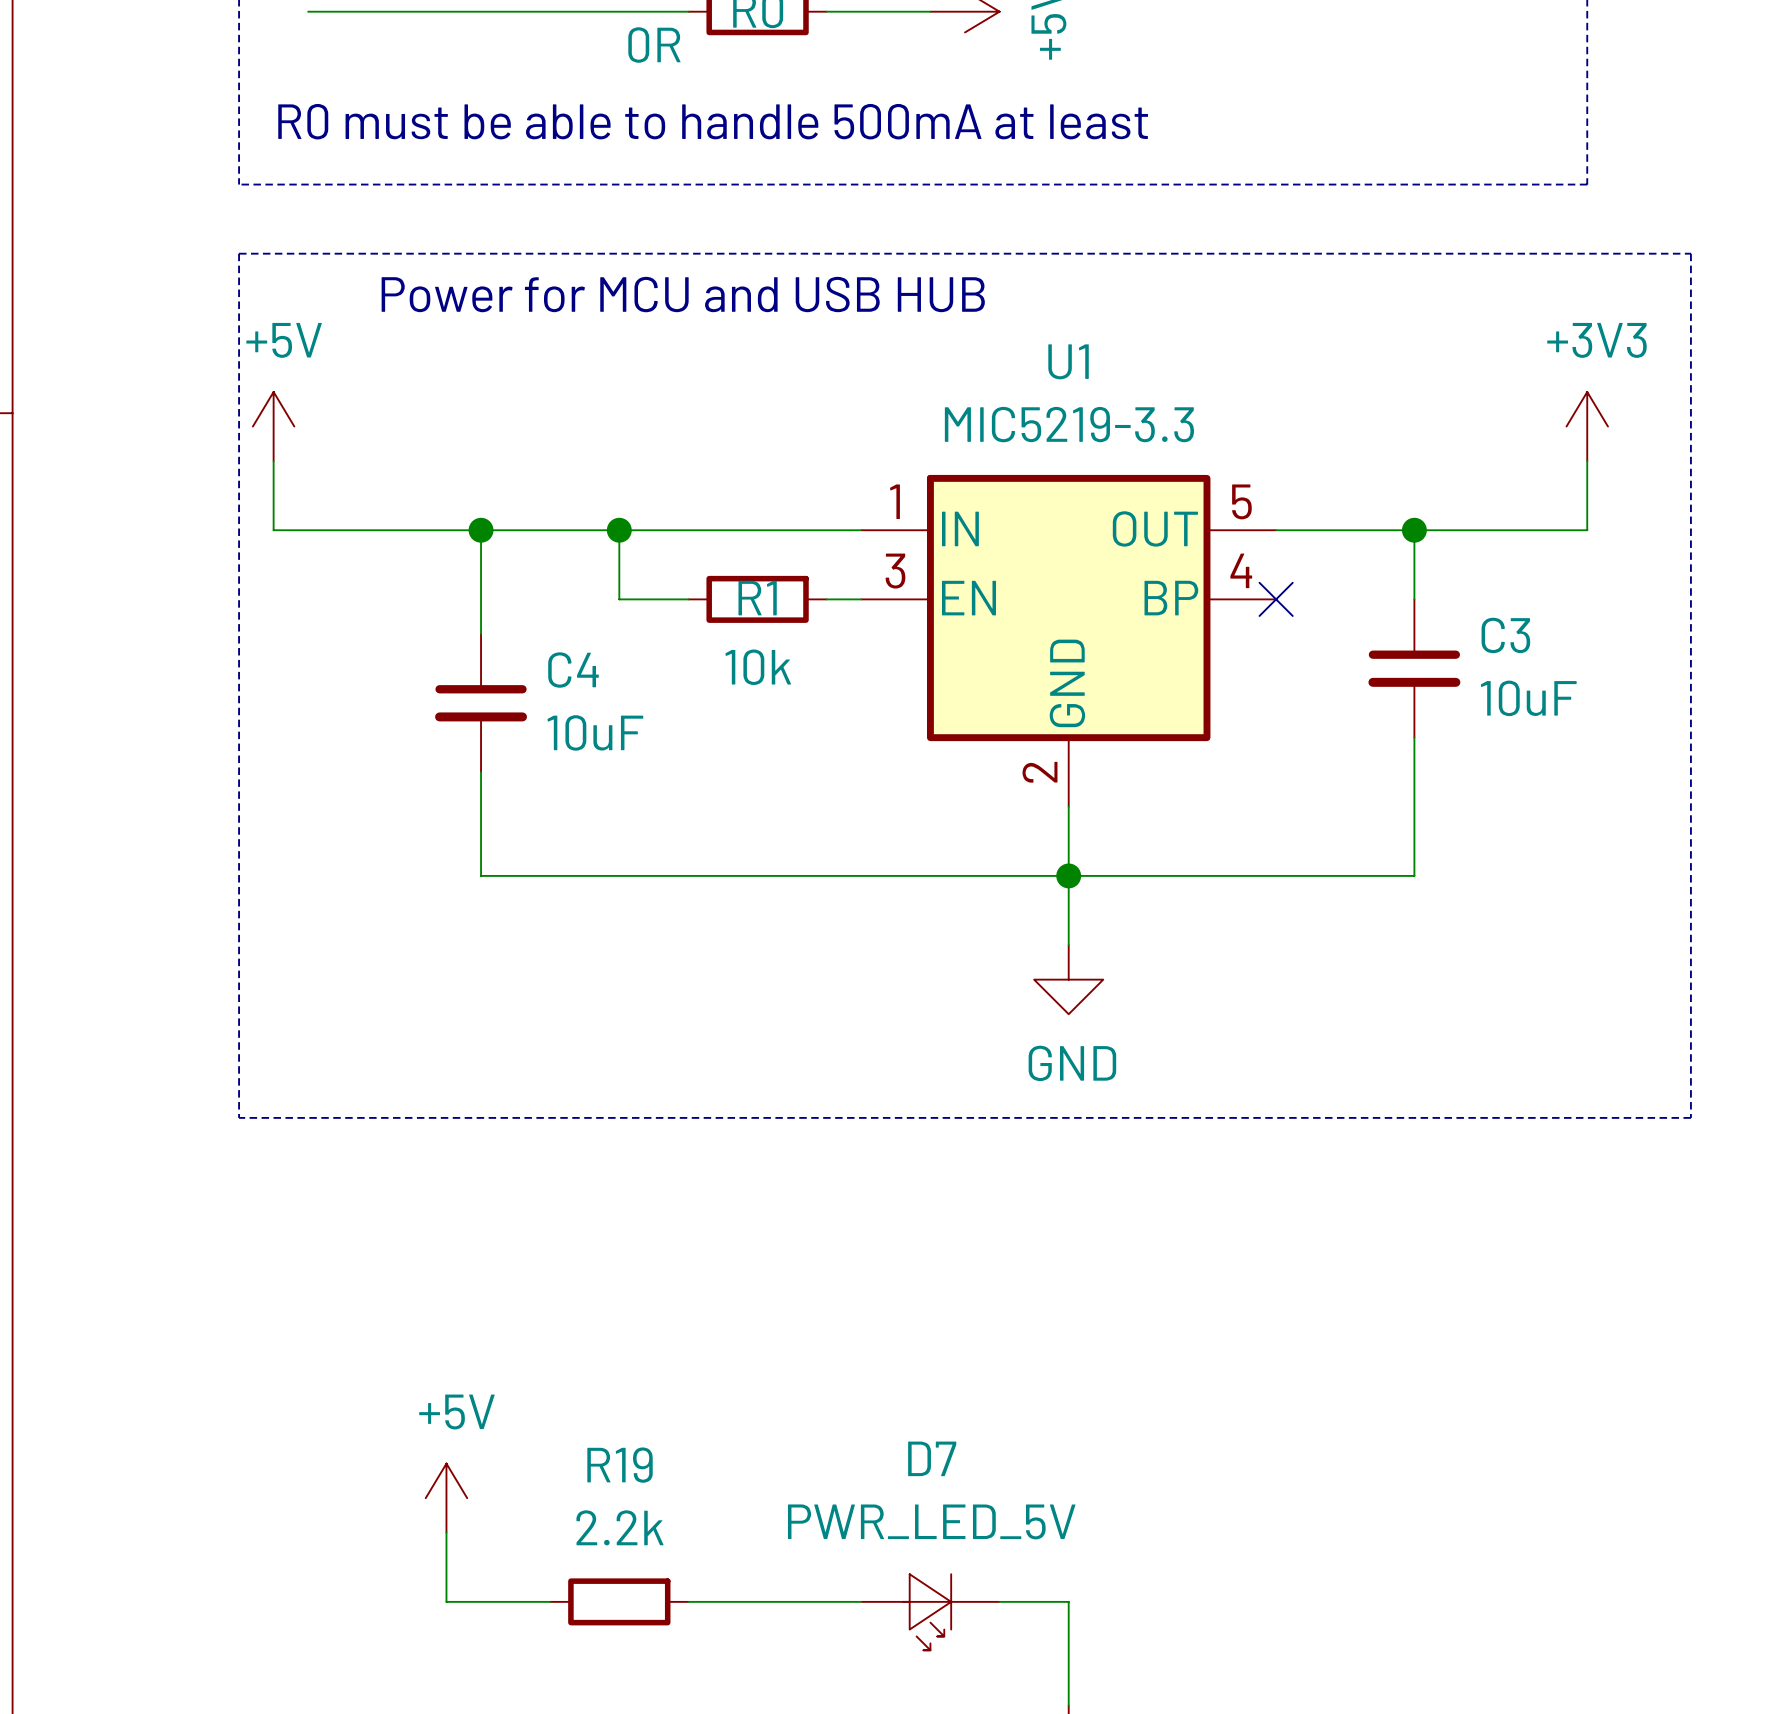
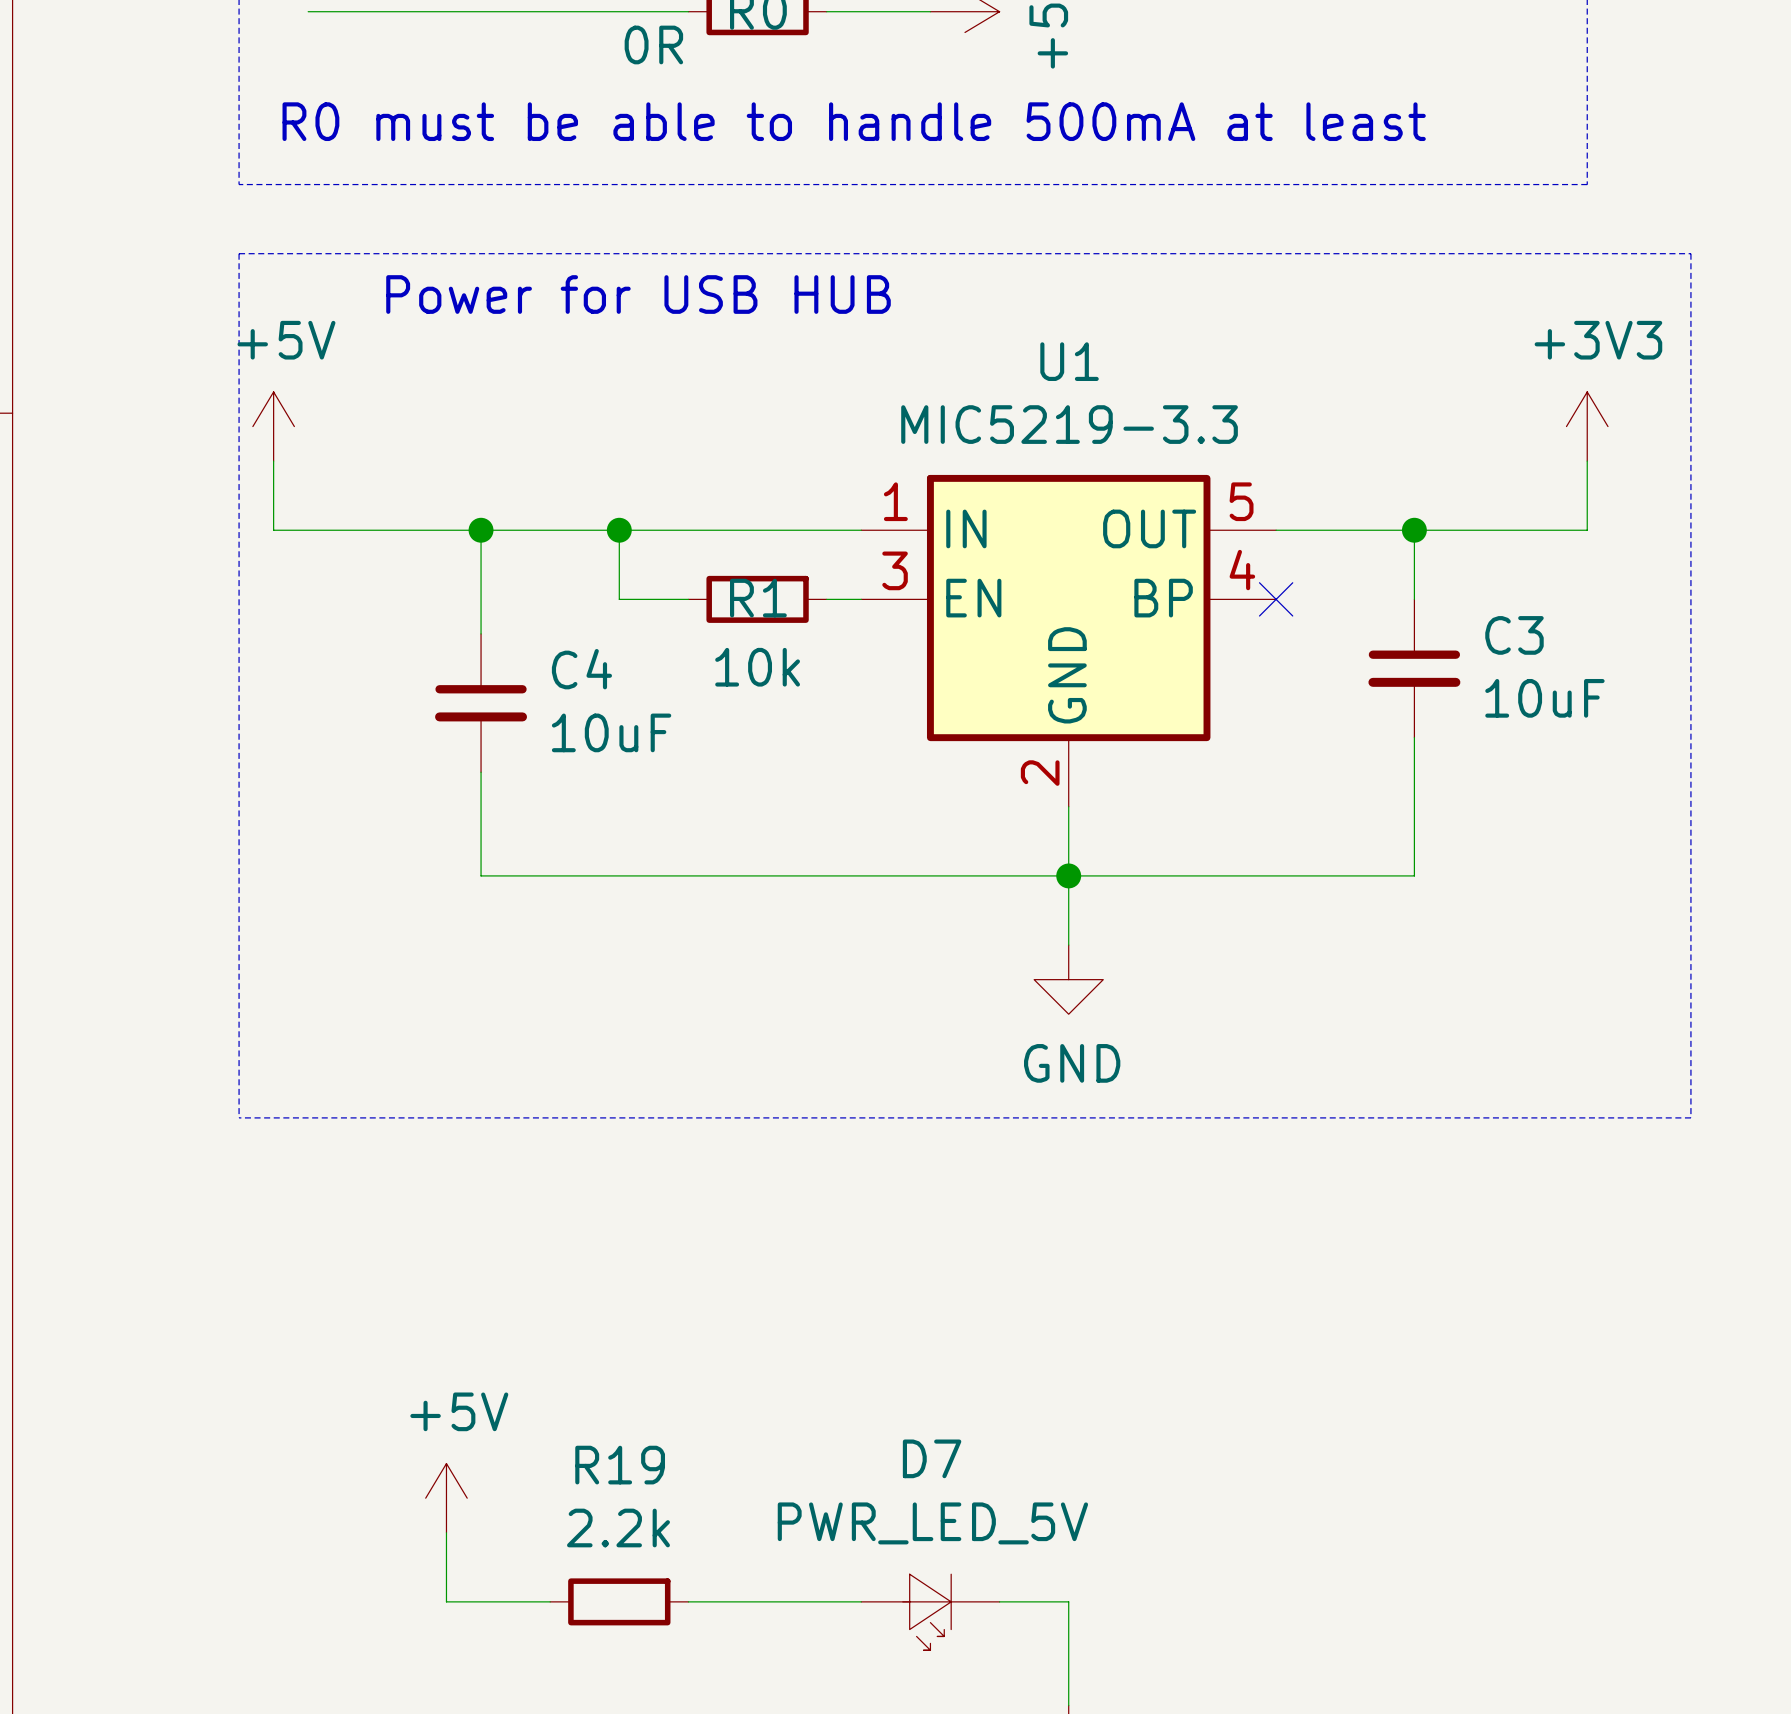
text: Power for MCU and USB HUB (683, 294) -> Power for USB HUB (638, 294)

